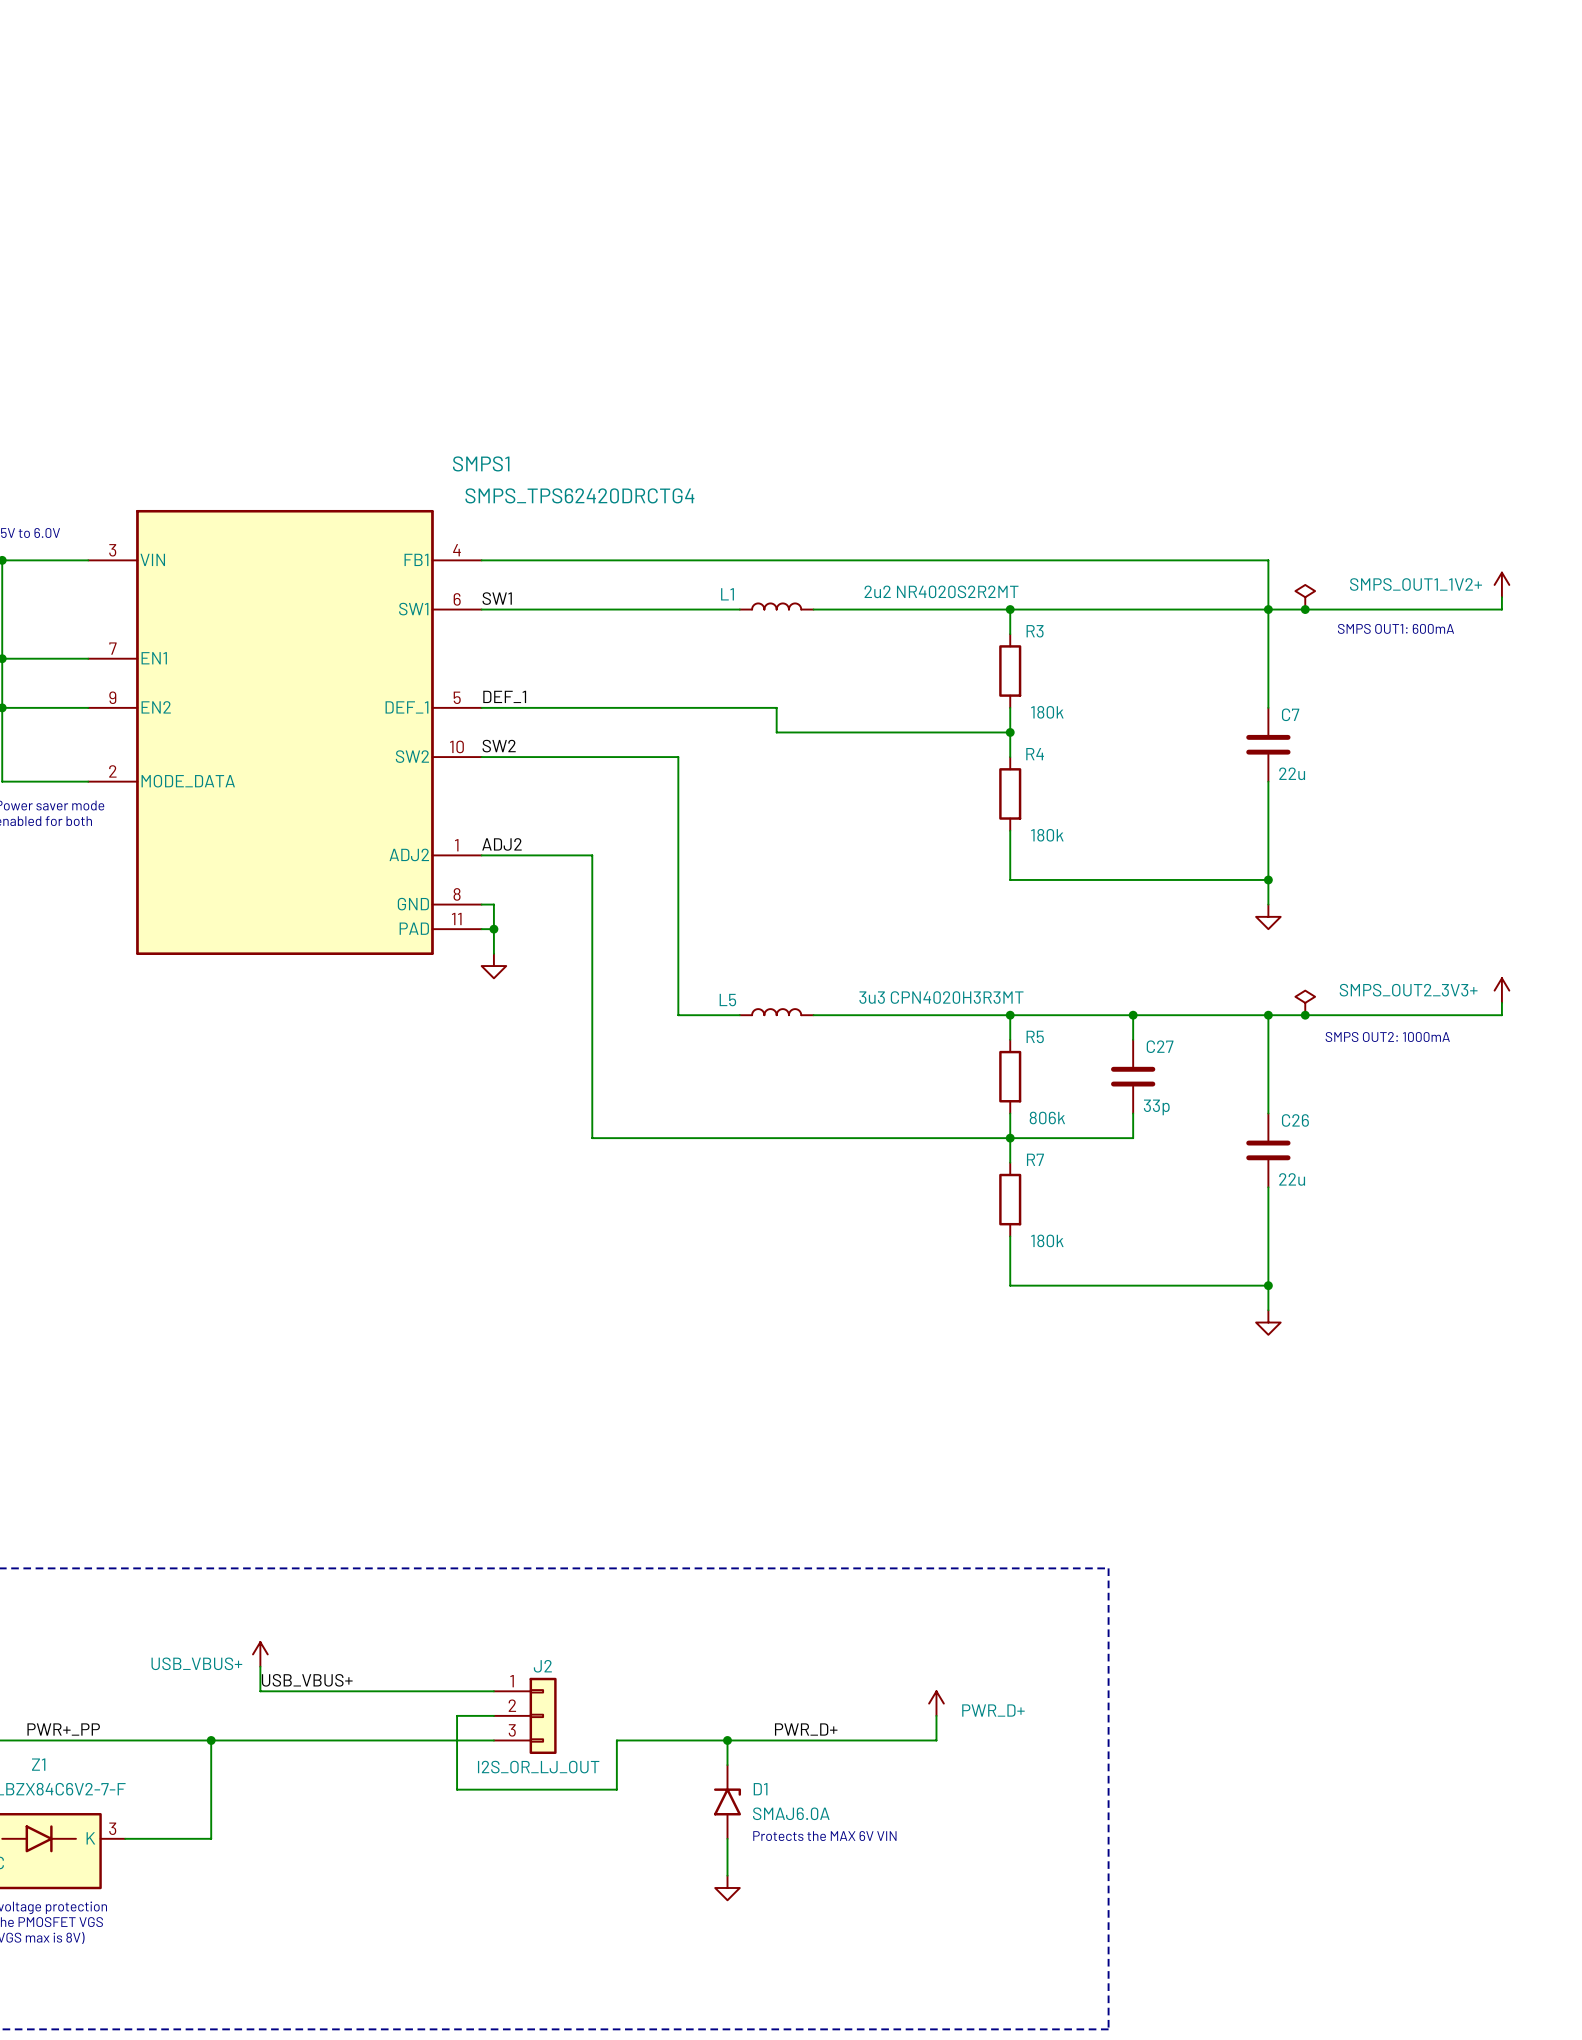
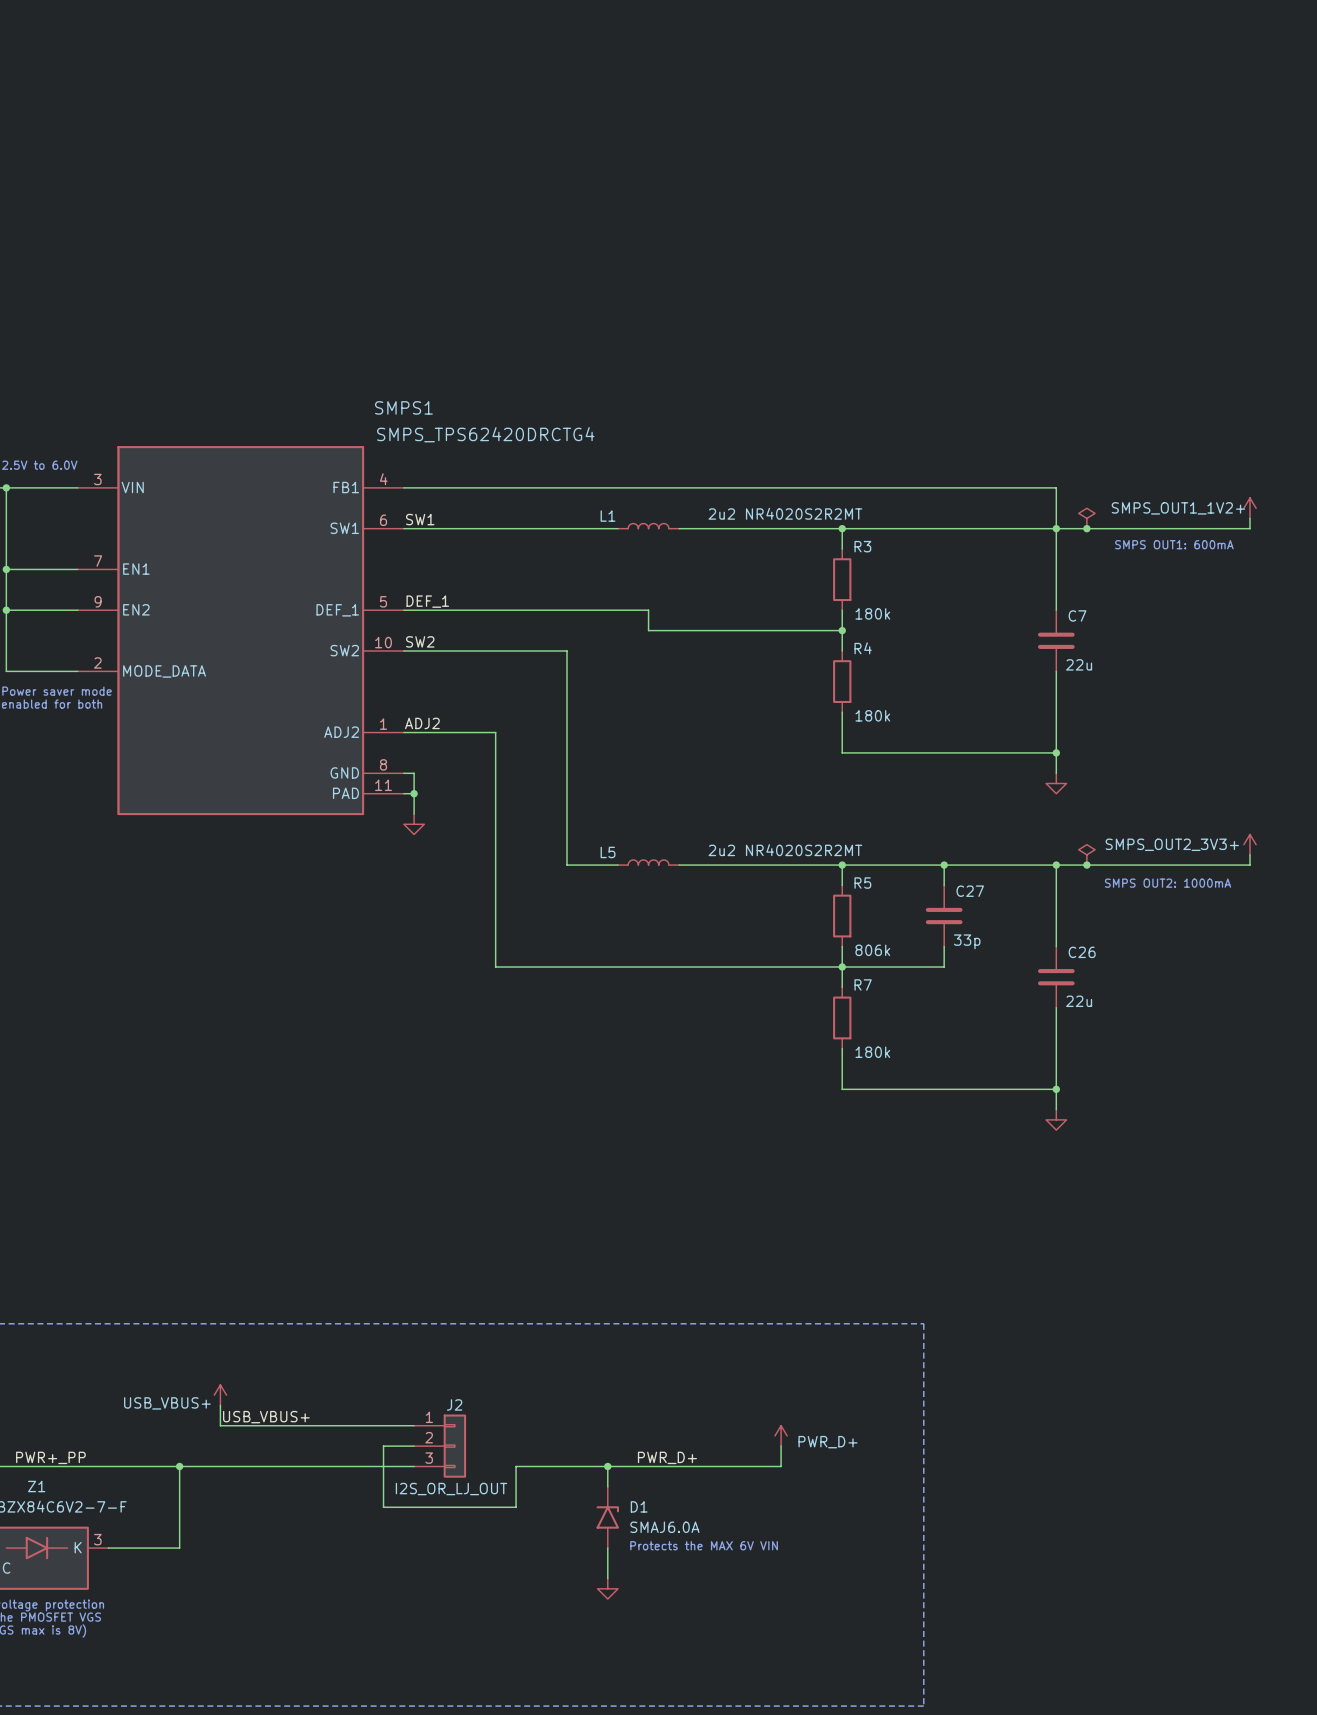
L5 value: 3u3 CPN4020H3R3MT (941, 997) -> 2u2 NR4020S2R2MT (785, 850)

